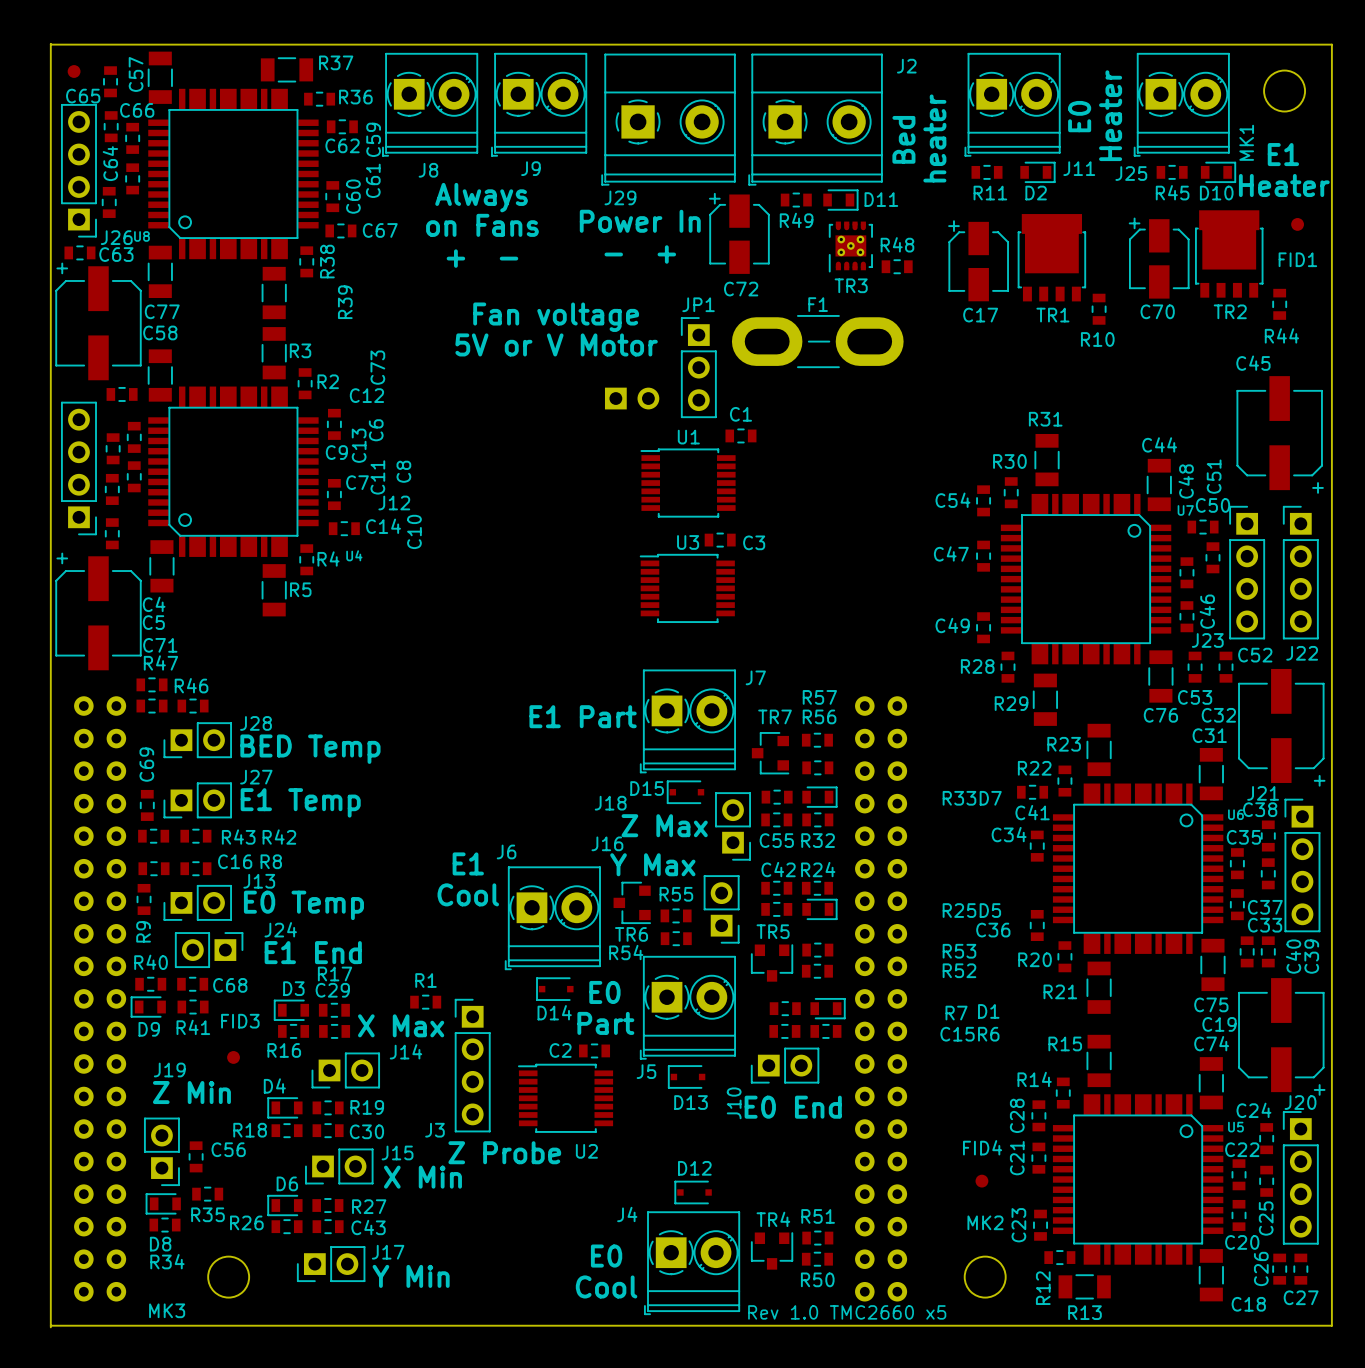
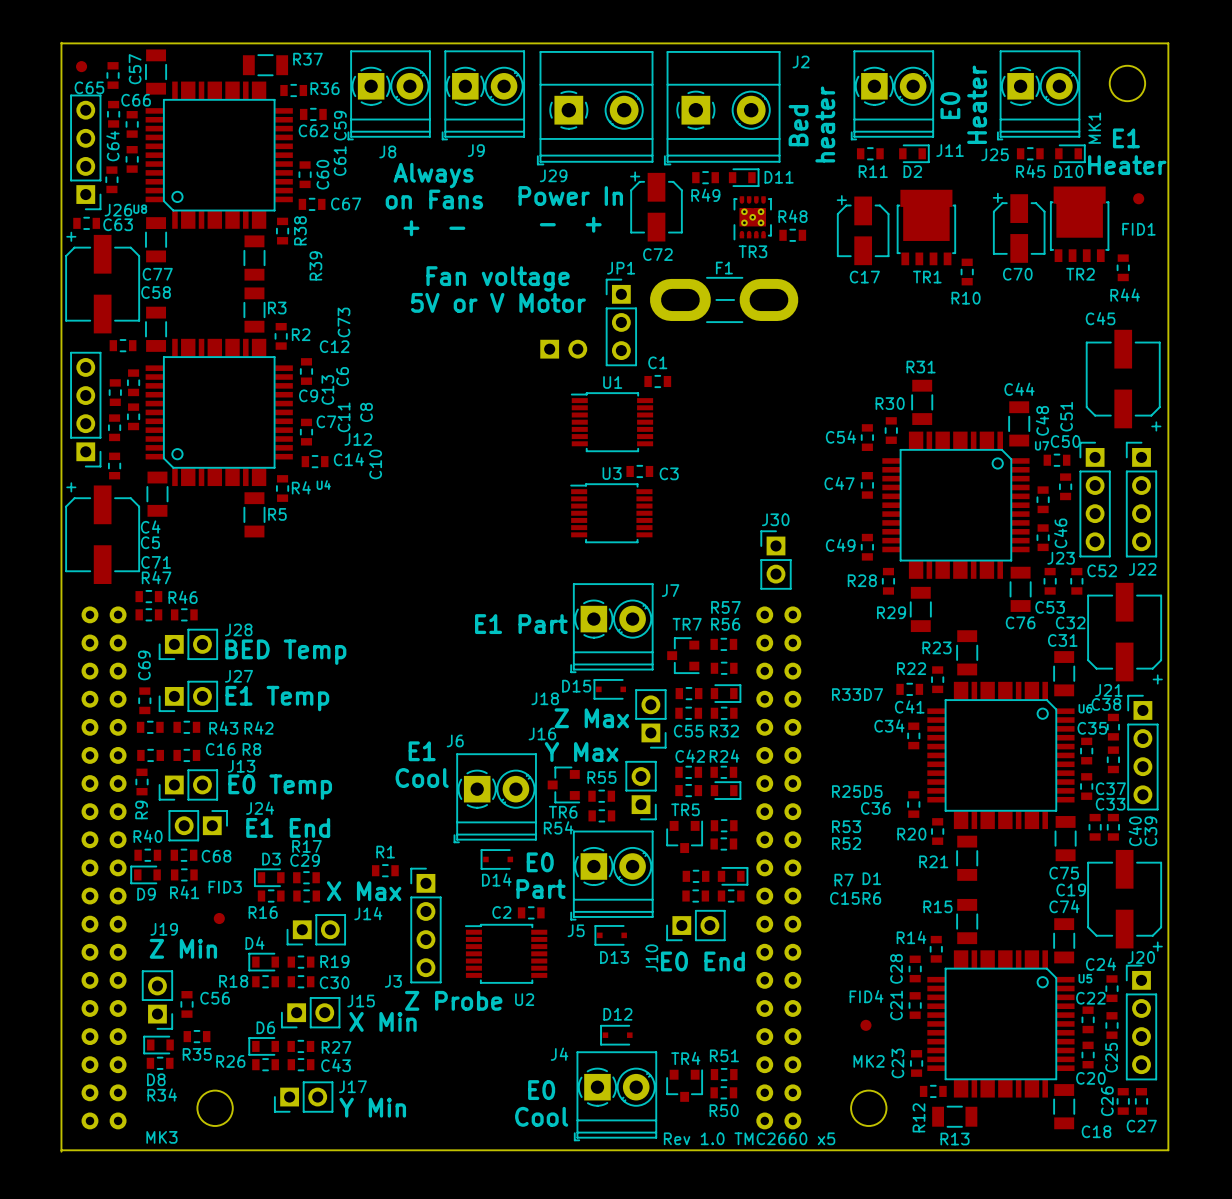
J30: none -> (776, 560)

